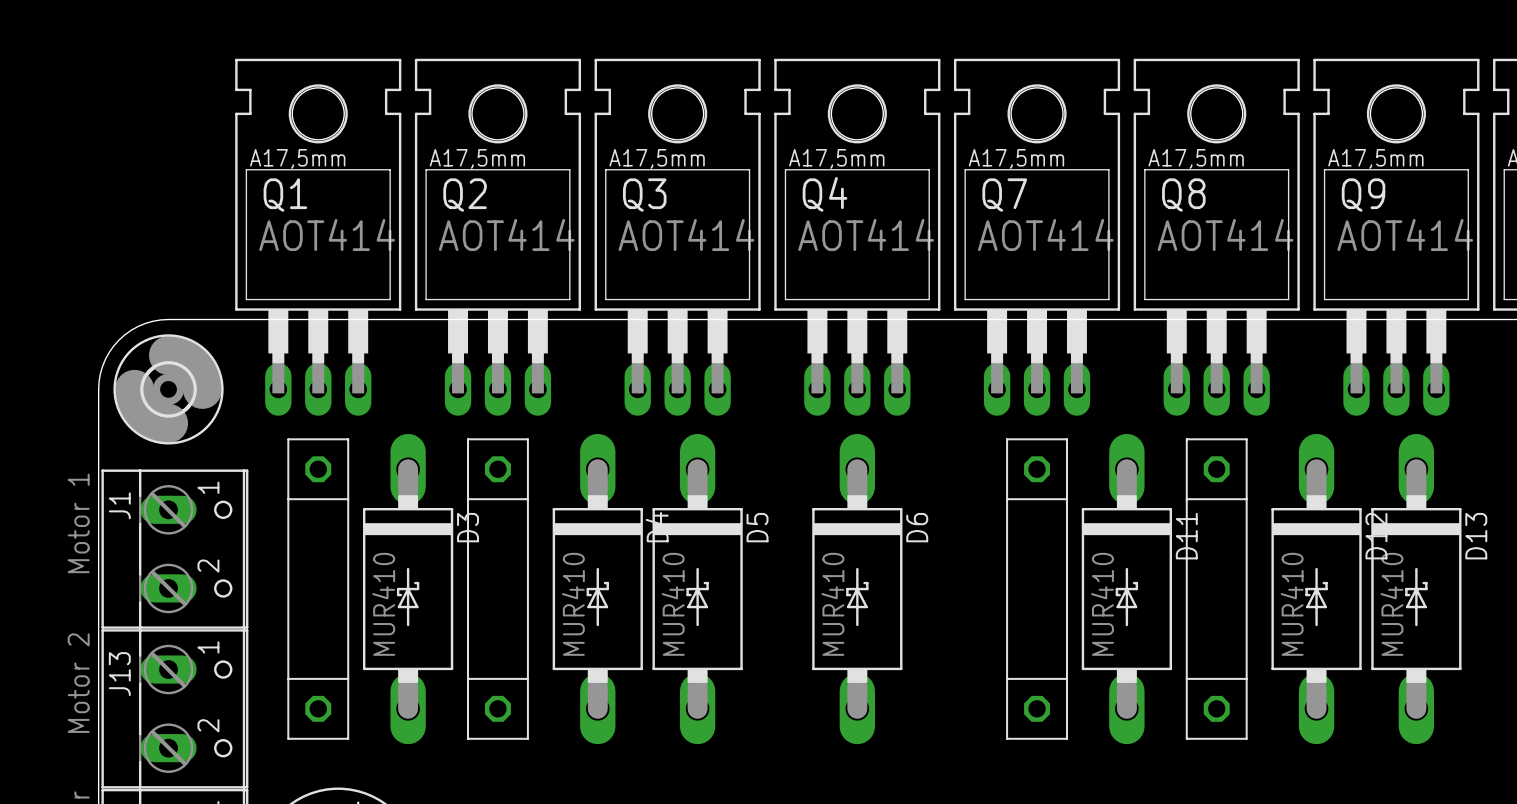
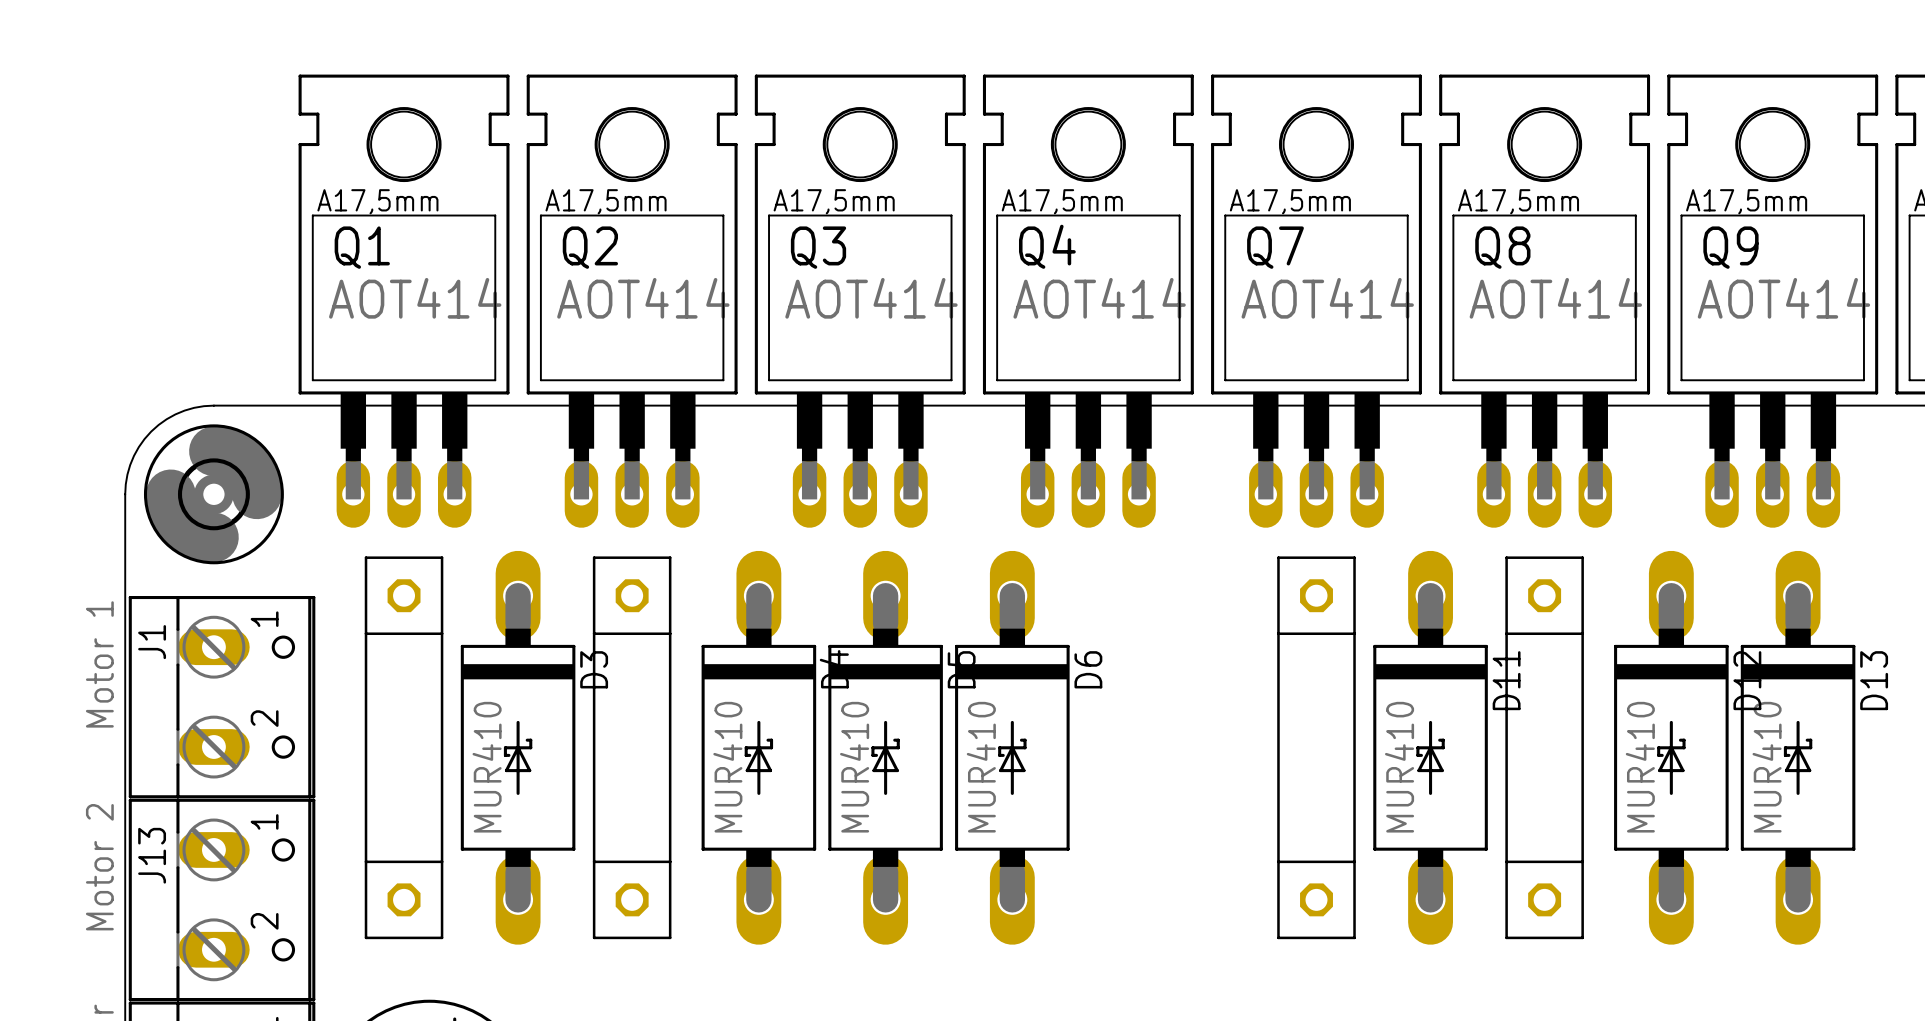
D6 position: (857, 589) -> (1012, 747)

